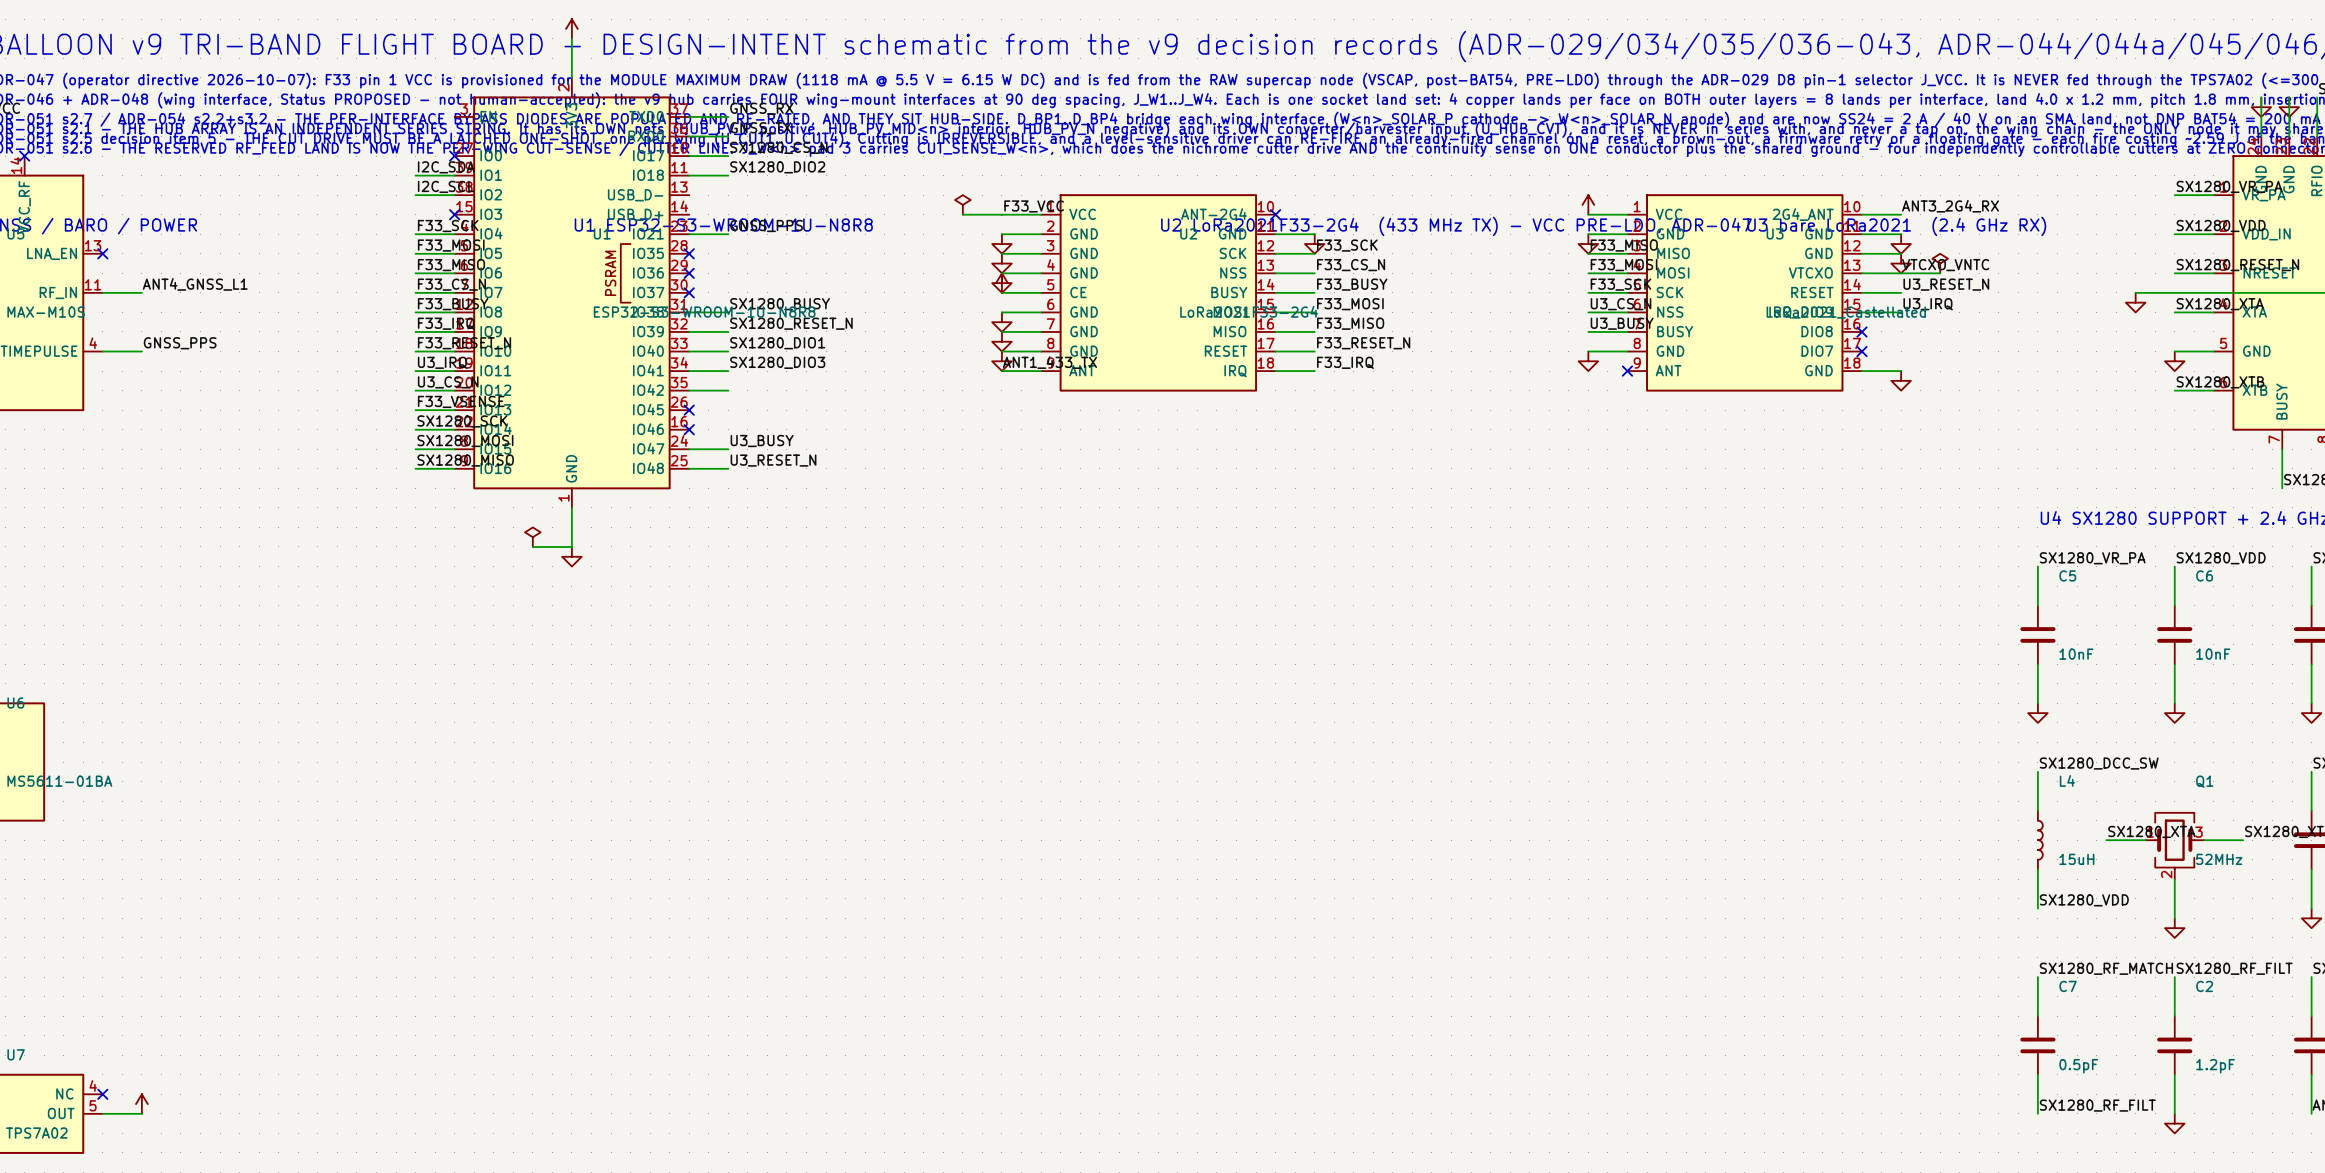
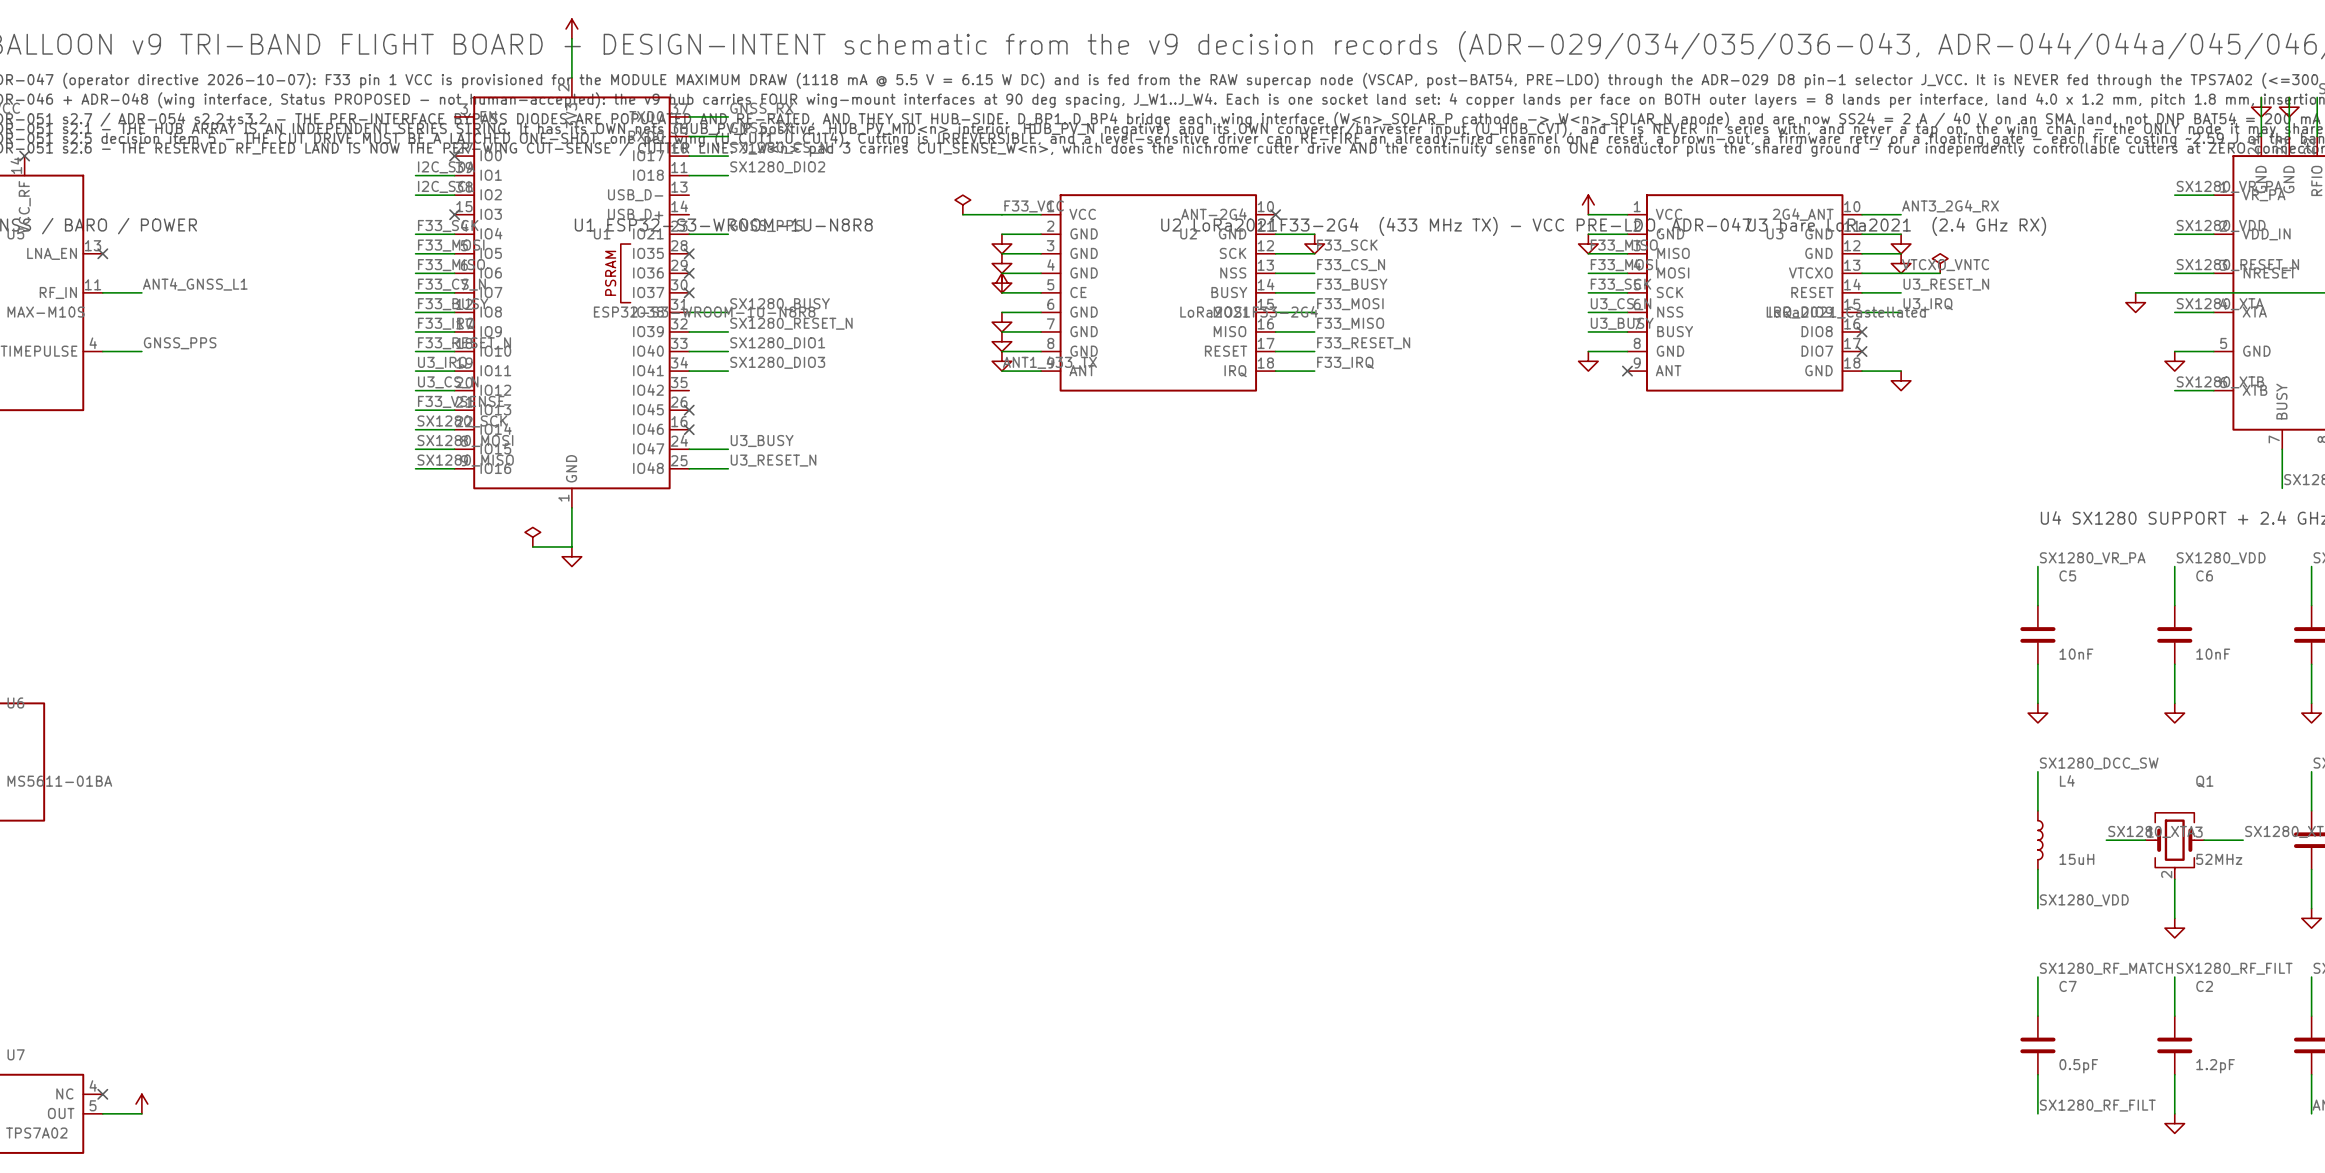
wire: (689, 390) (728, 390) -> none

